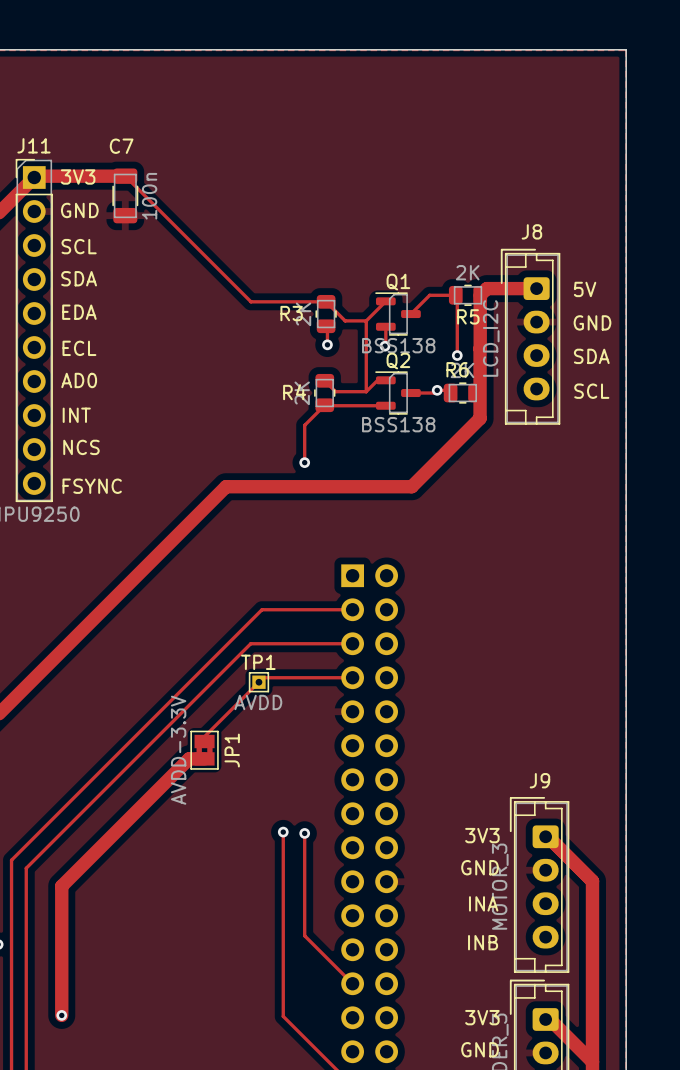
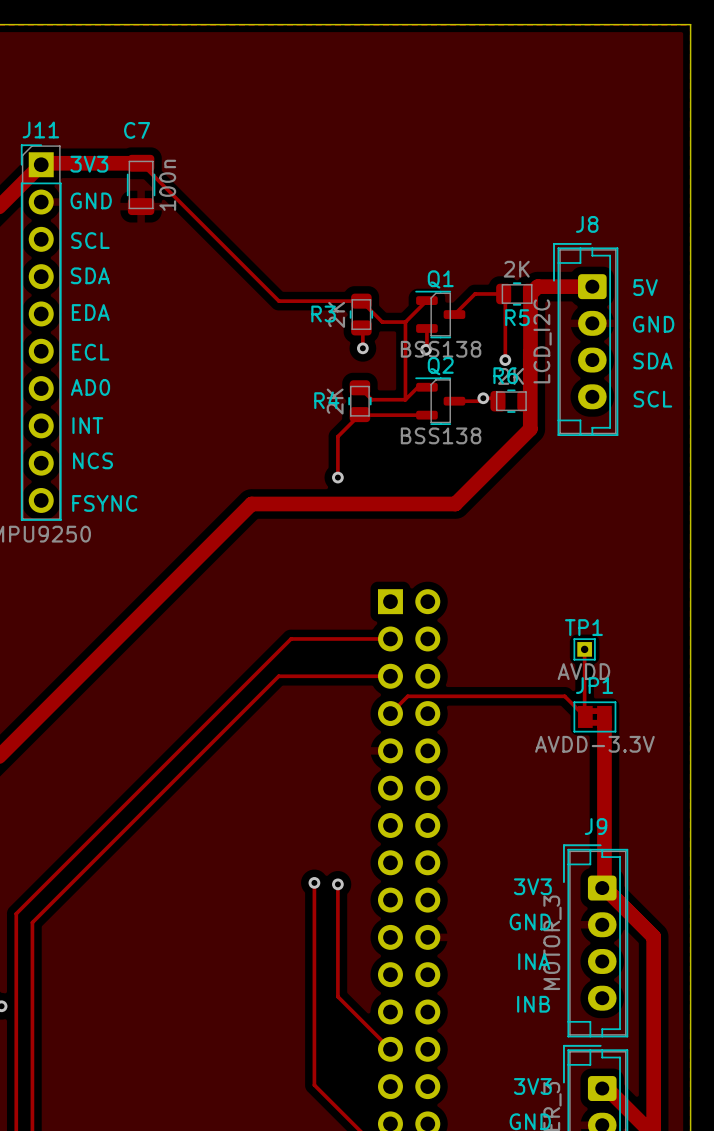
track: none -> (584, 649) (584, 716)
track: (352, 677) (263, 677) (204, 736) (204, 741) -> (390, 713) (407, 696) (564, 696) (585, 716)
track: none -> (604, 716) (604, 887)
TP1 position: (258, 682) -> (584, 649)
JP1 value position: AVDD-3.3V (178, 750) -> AVDD-3.3V (594, 744)
JP1 rotation: 0° (204, 750) -> 90° clockwise (594, 716)
JP1 position: (204, 750) -> (594, 716)
JP1 name position: JP1 (232, 750) -> JP1 (594, 685)
track: (204, 758) (189, 758) (61, 886) (61, 1015) -> none
via: (61, 1015) -> none

